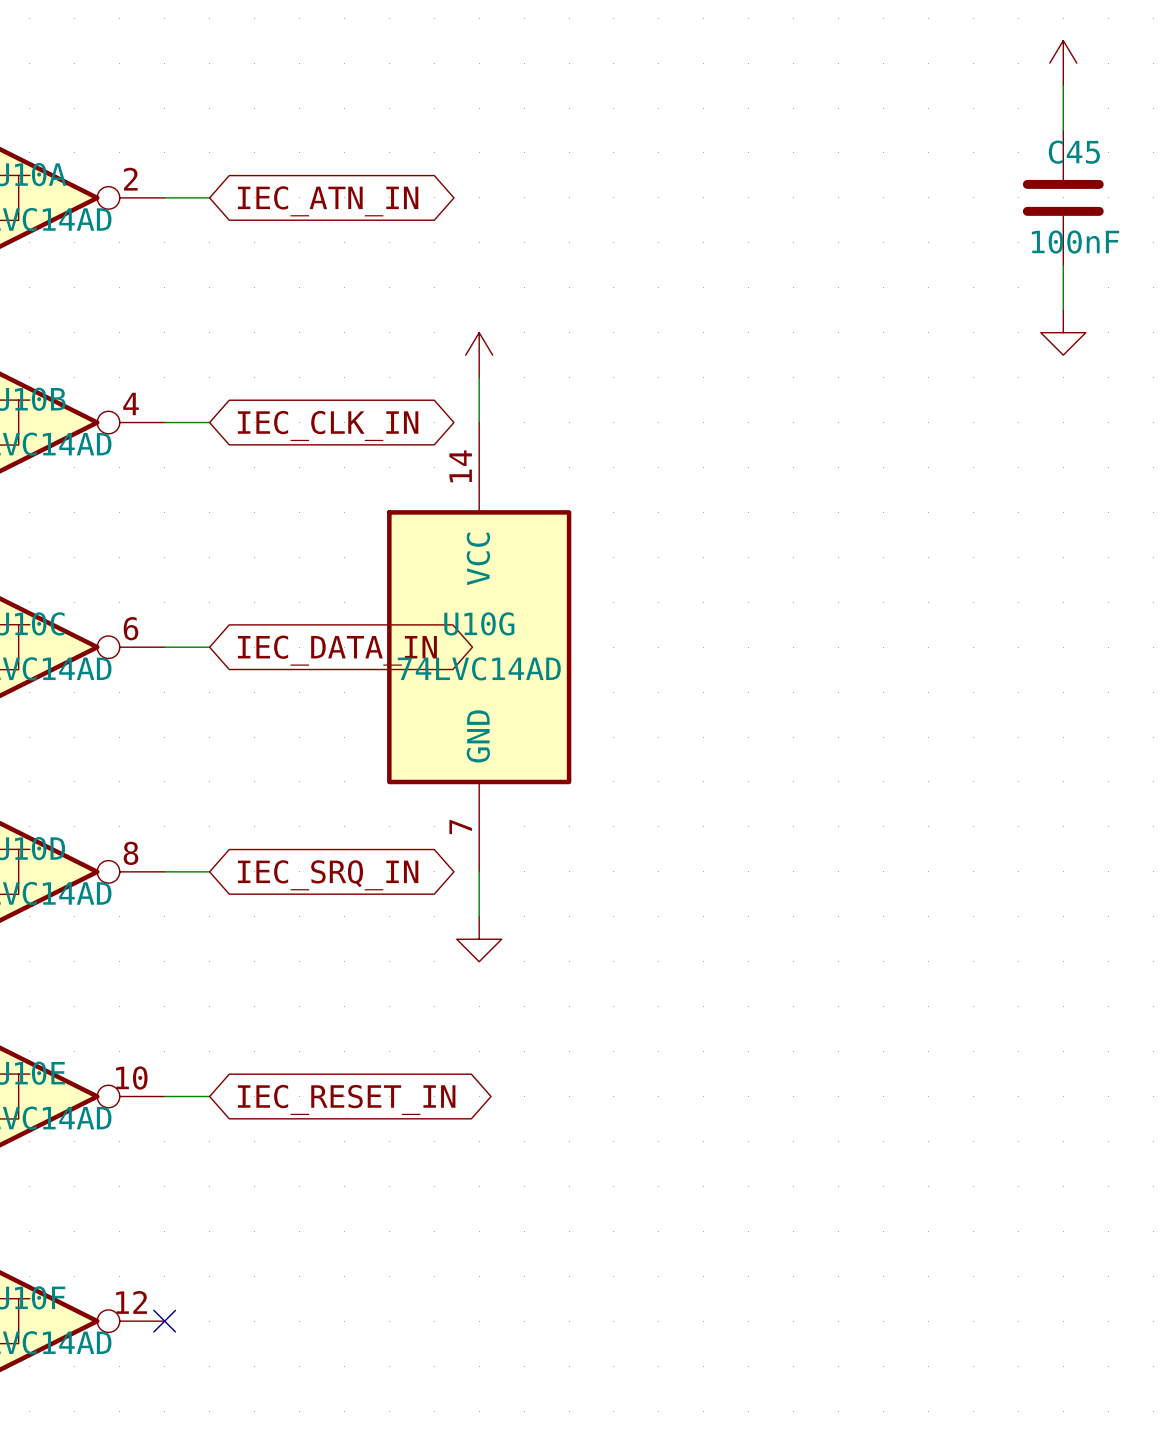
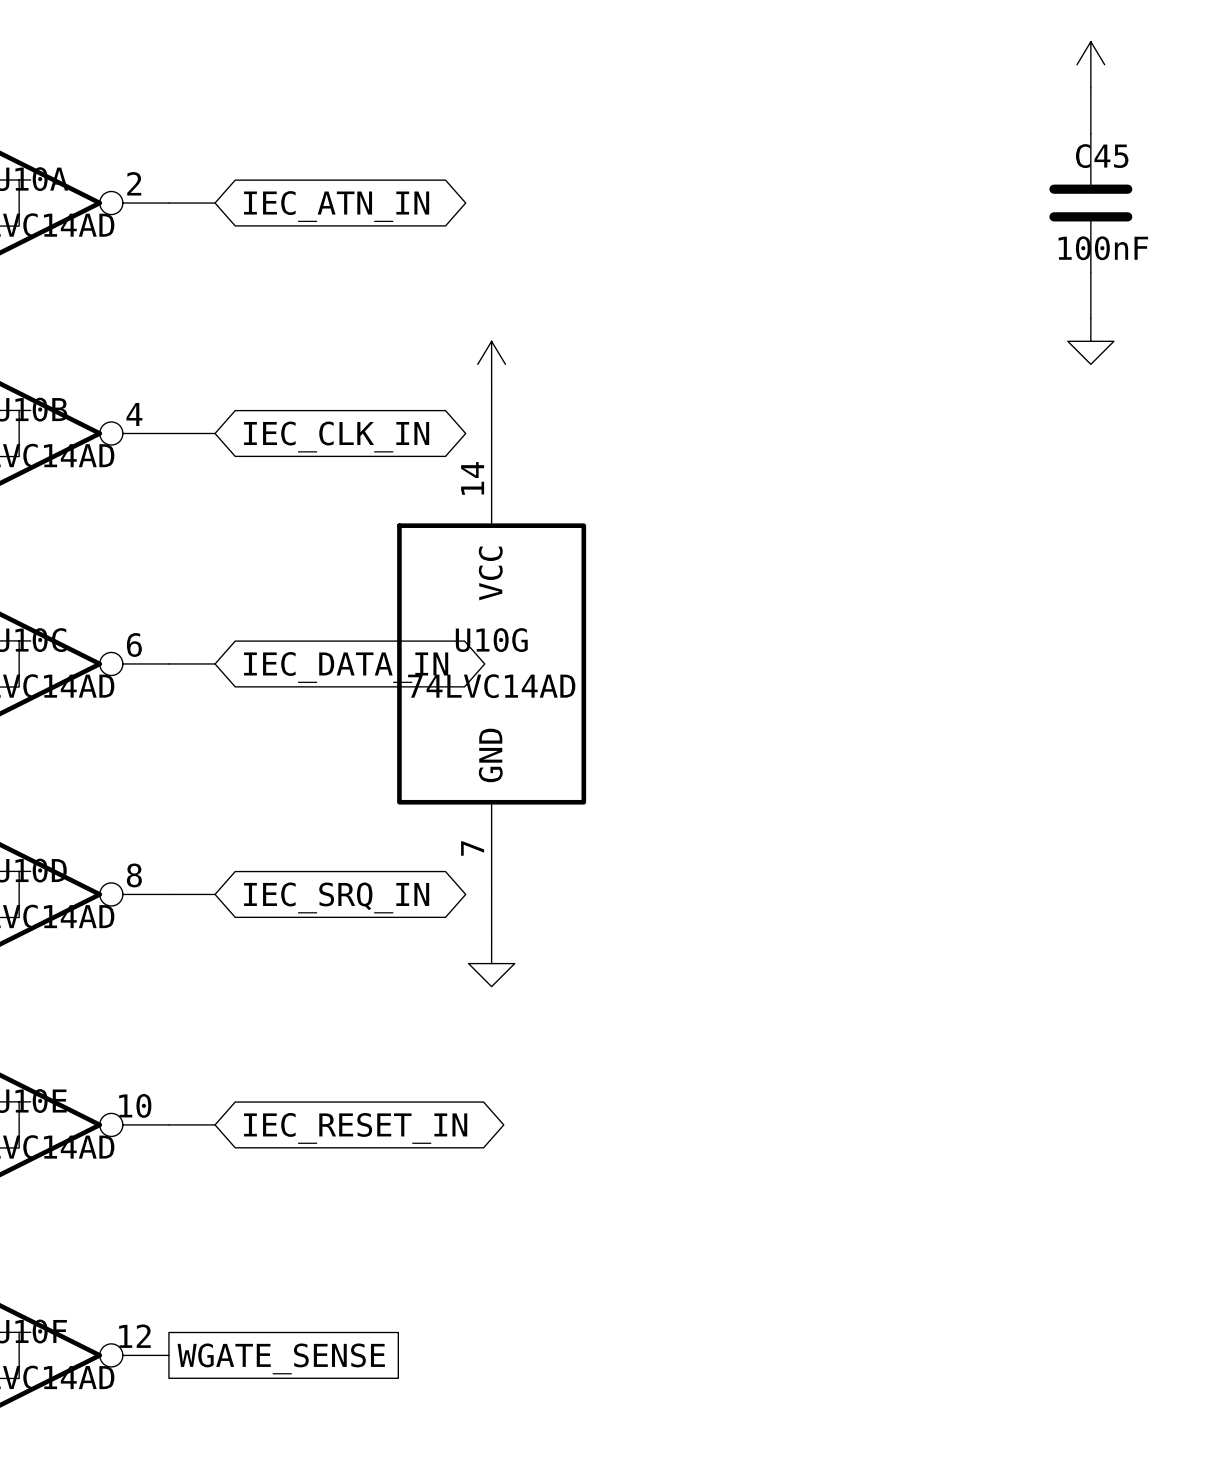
no-connect mark: (164, 1321) -> none
global label: none -> WGATE_SENSE (281, 1358)

